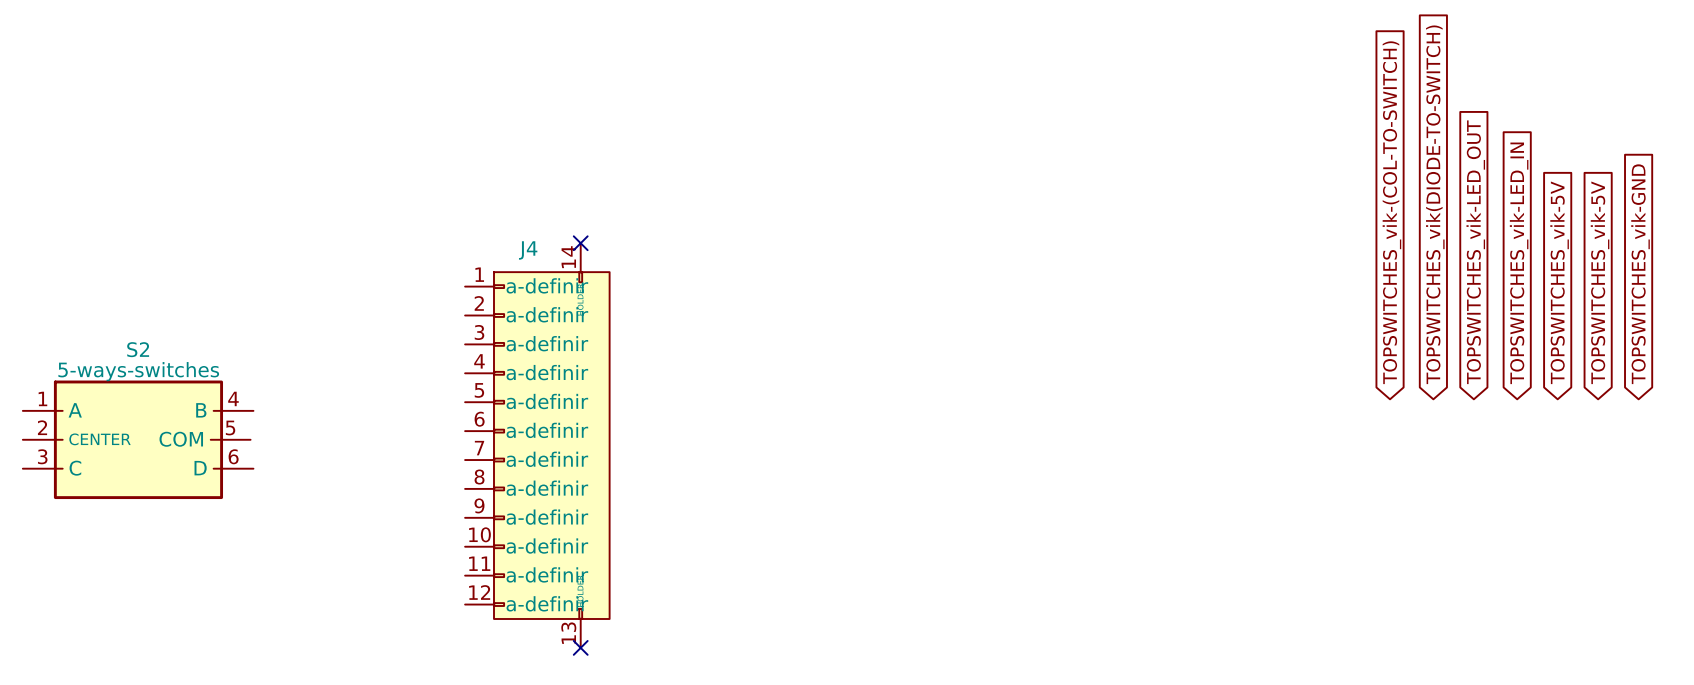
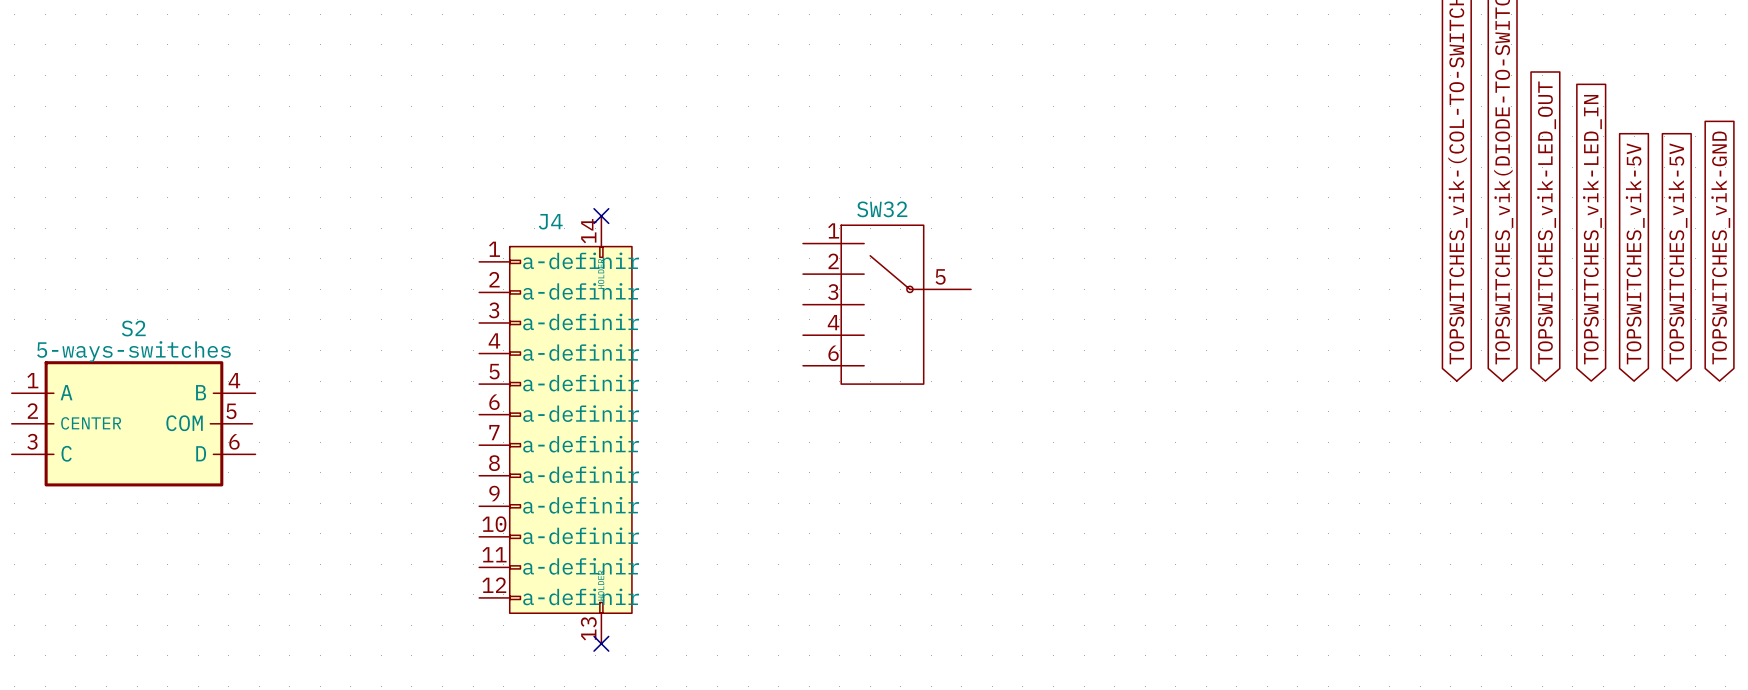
SW32: none -> (887, 304)

